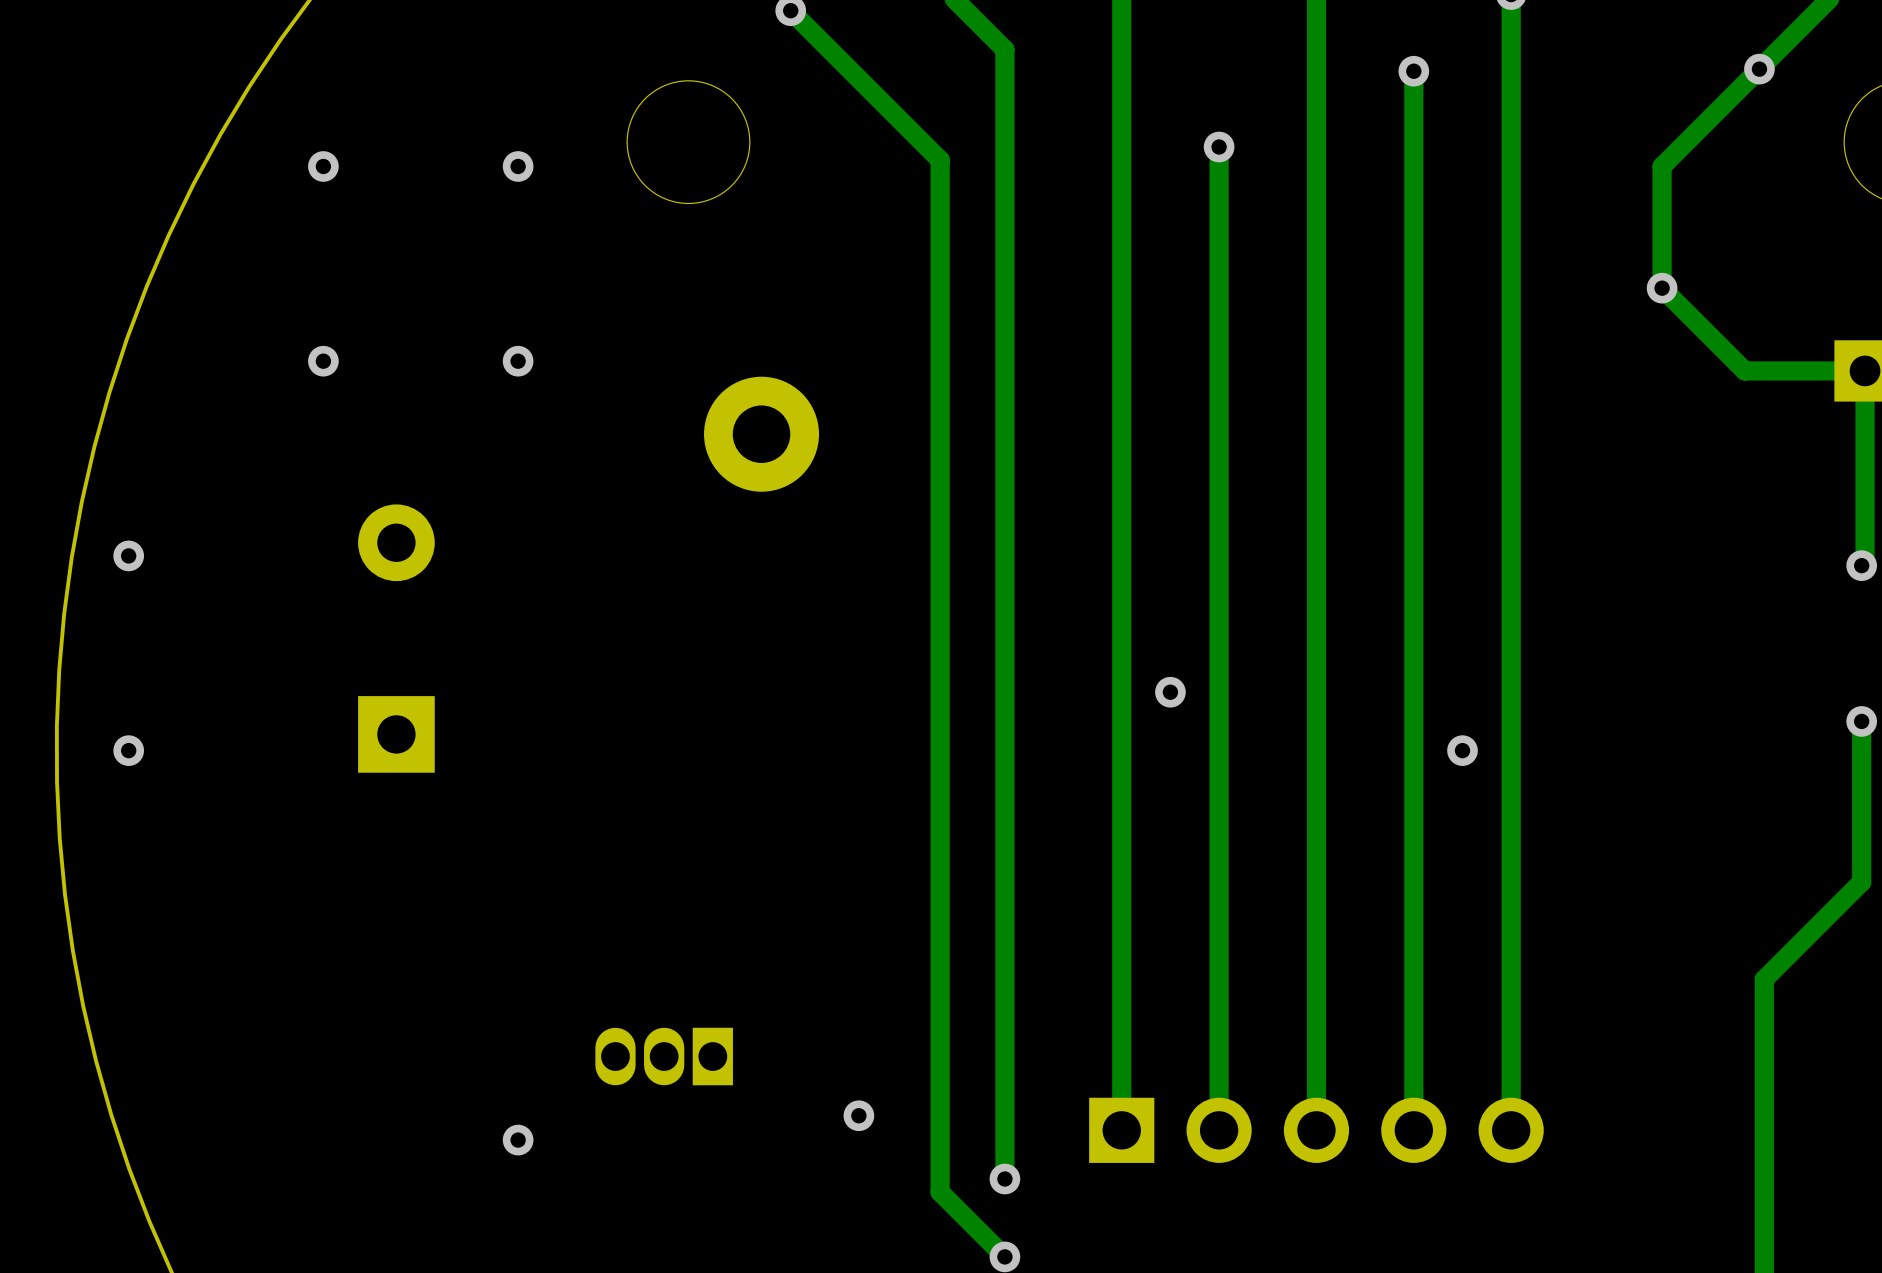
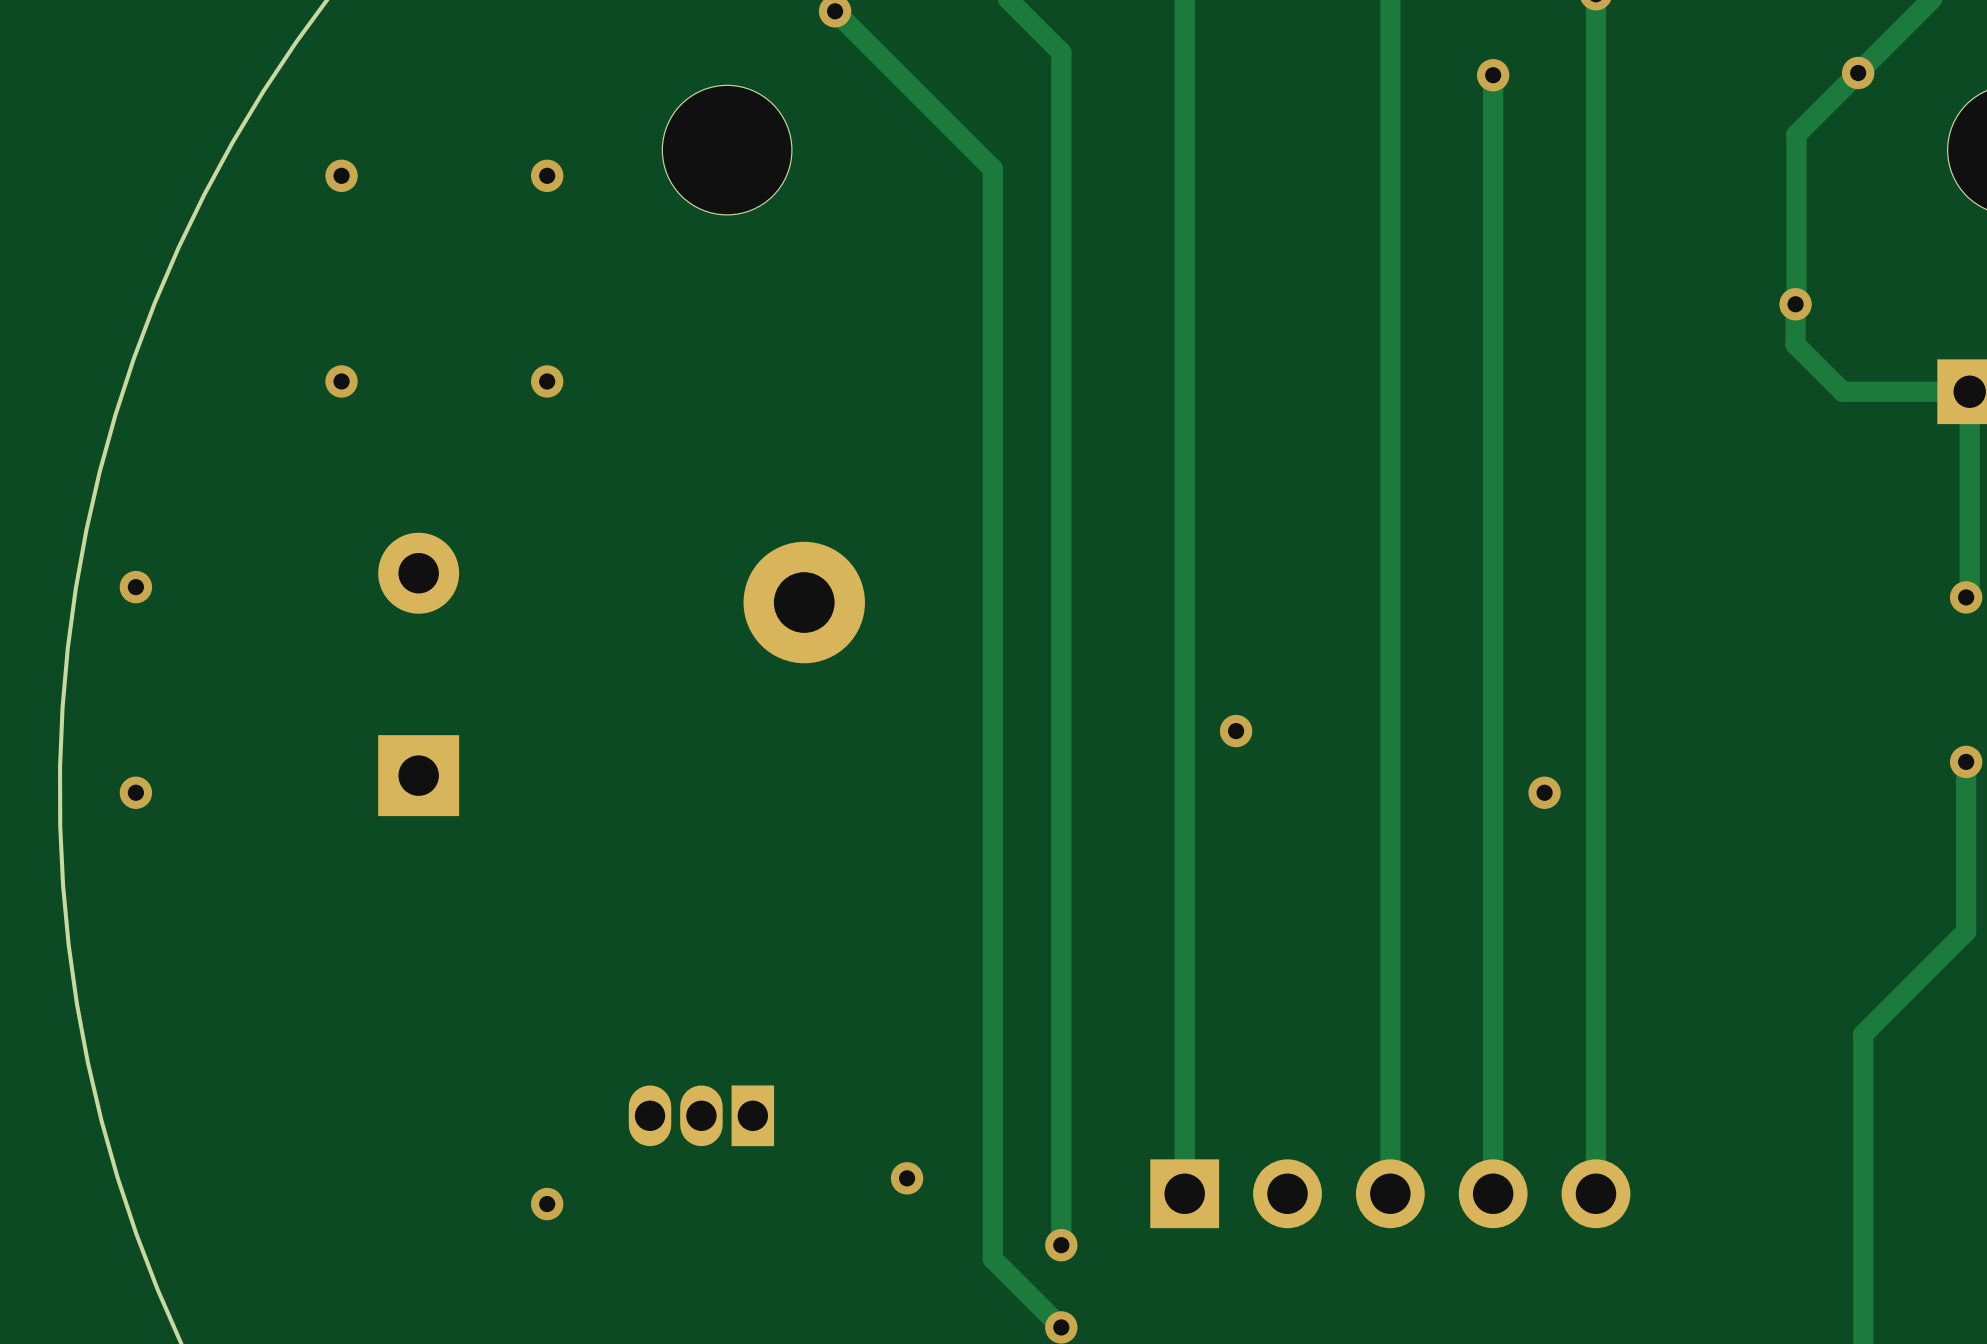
track: (1701, 127) (1662, 166) (1662, 288) (1700, 326) -> (1796, 134) (1795, 344)
track: (1219, 147) (1219, 1120) -> none
via: (1219, 147) -> none
via position: (1662, 288) -> (1795, 304)
part position: (761, 434) -> (804, 602)

